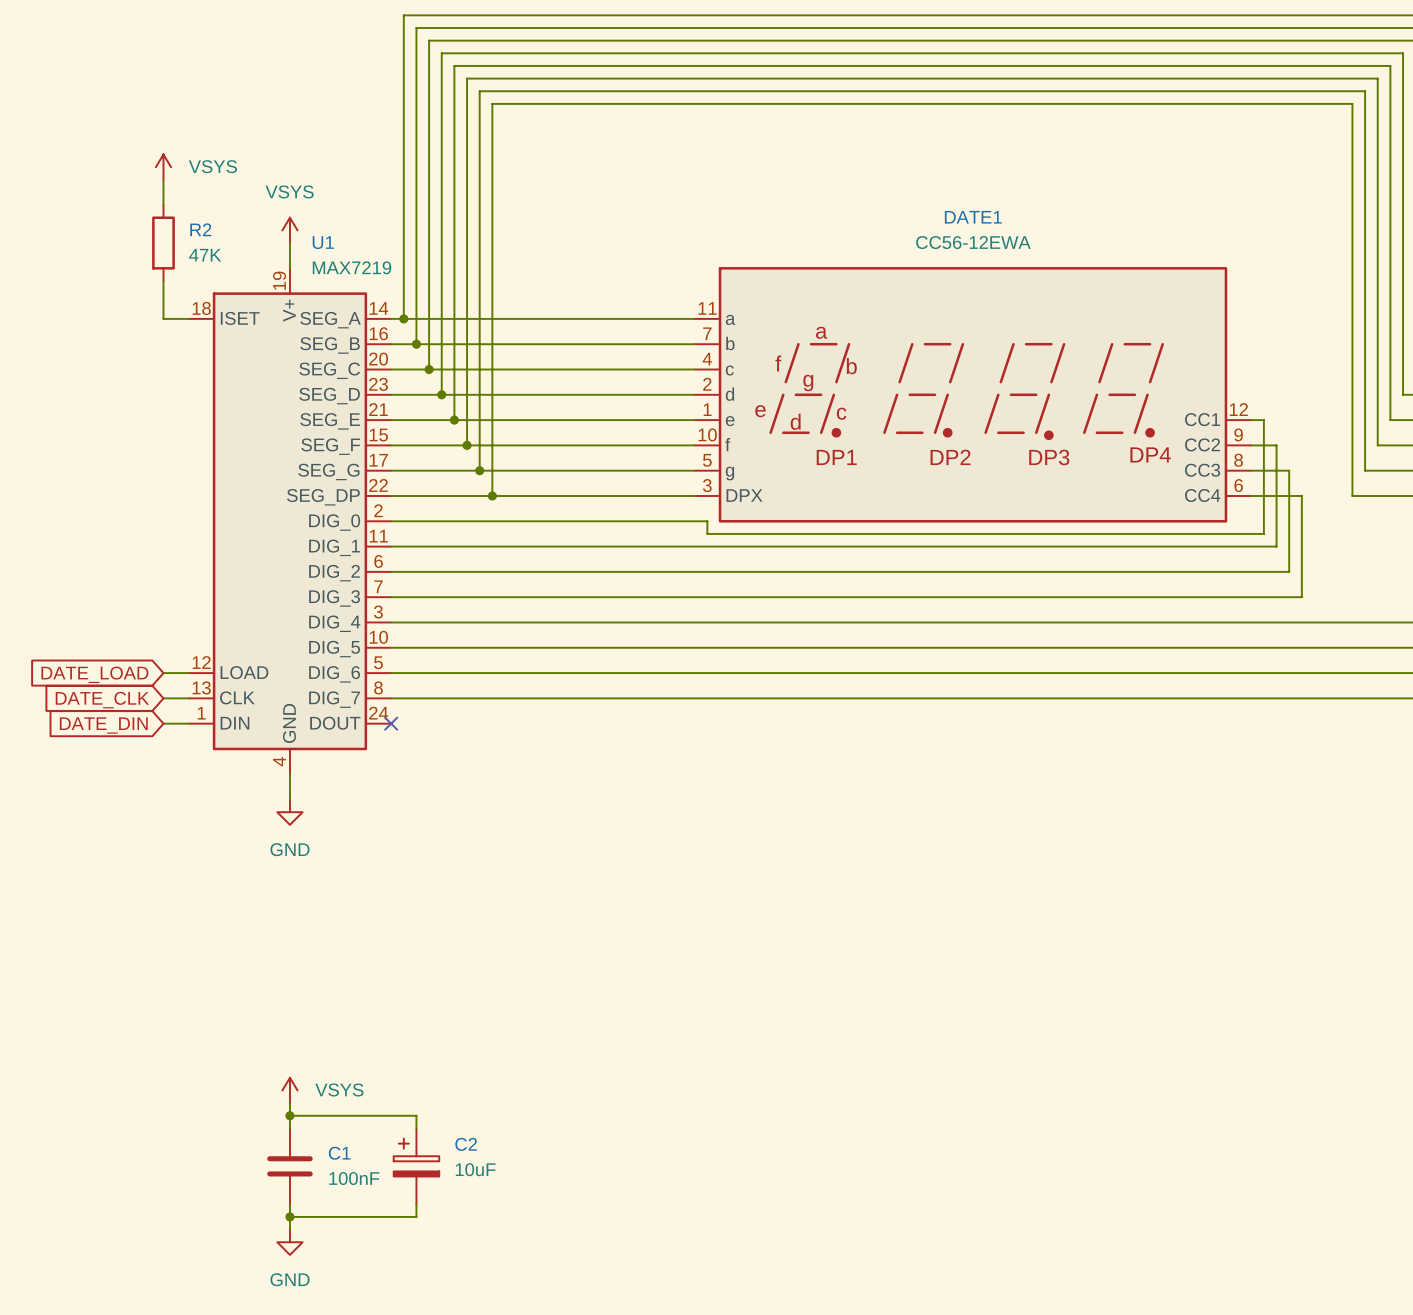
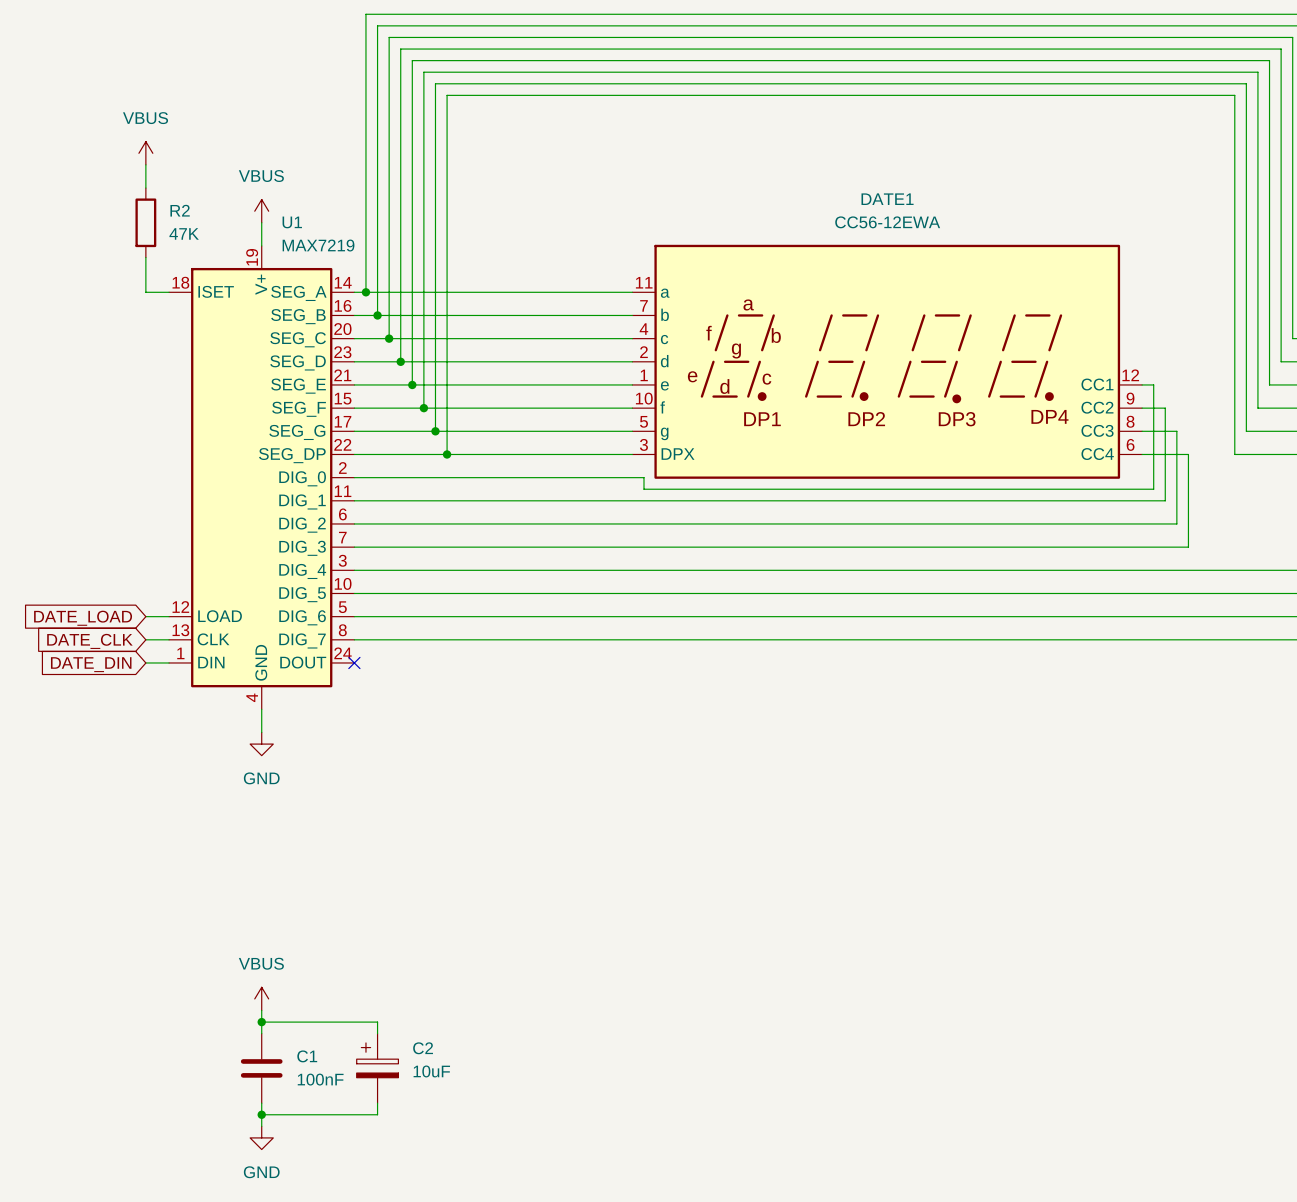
power symbol: VSYS (163, 167) -> VBUS (145, 153)
power symbol: VSYS (289, 230) -> VBUS (261, 211)
power symbol: VSYS (289, 1090) -> VBUS (261, 998)

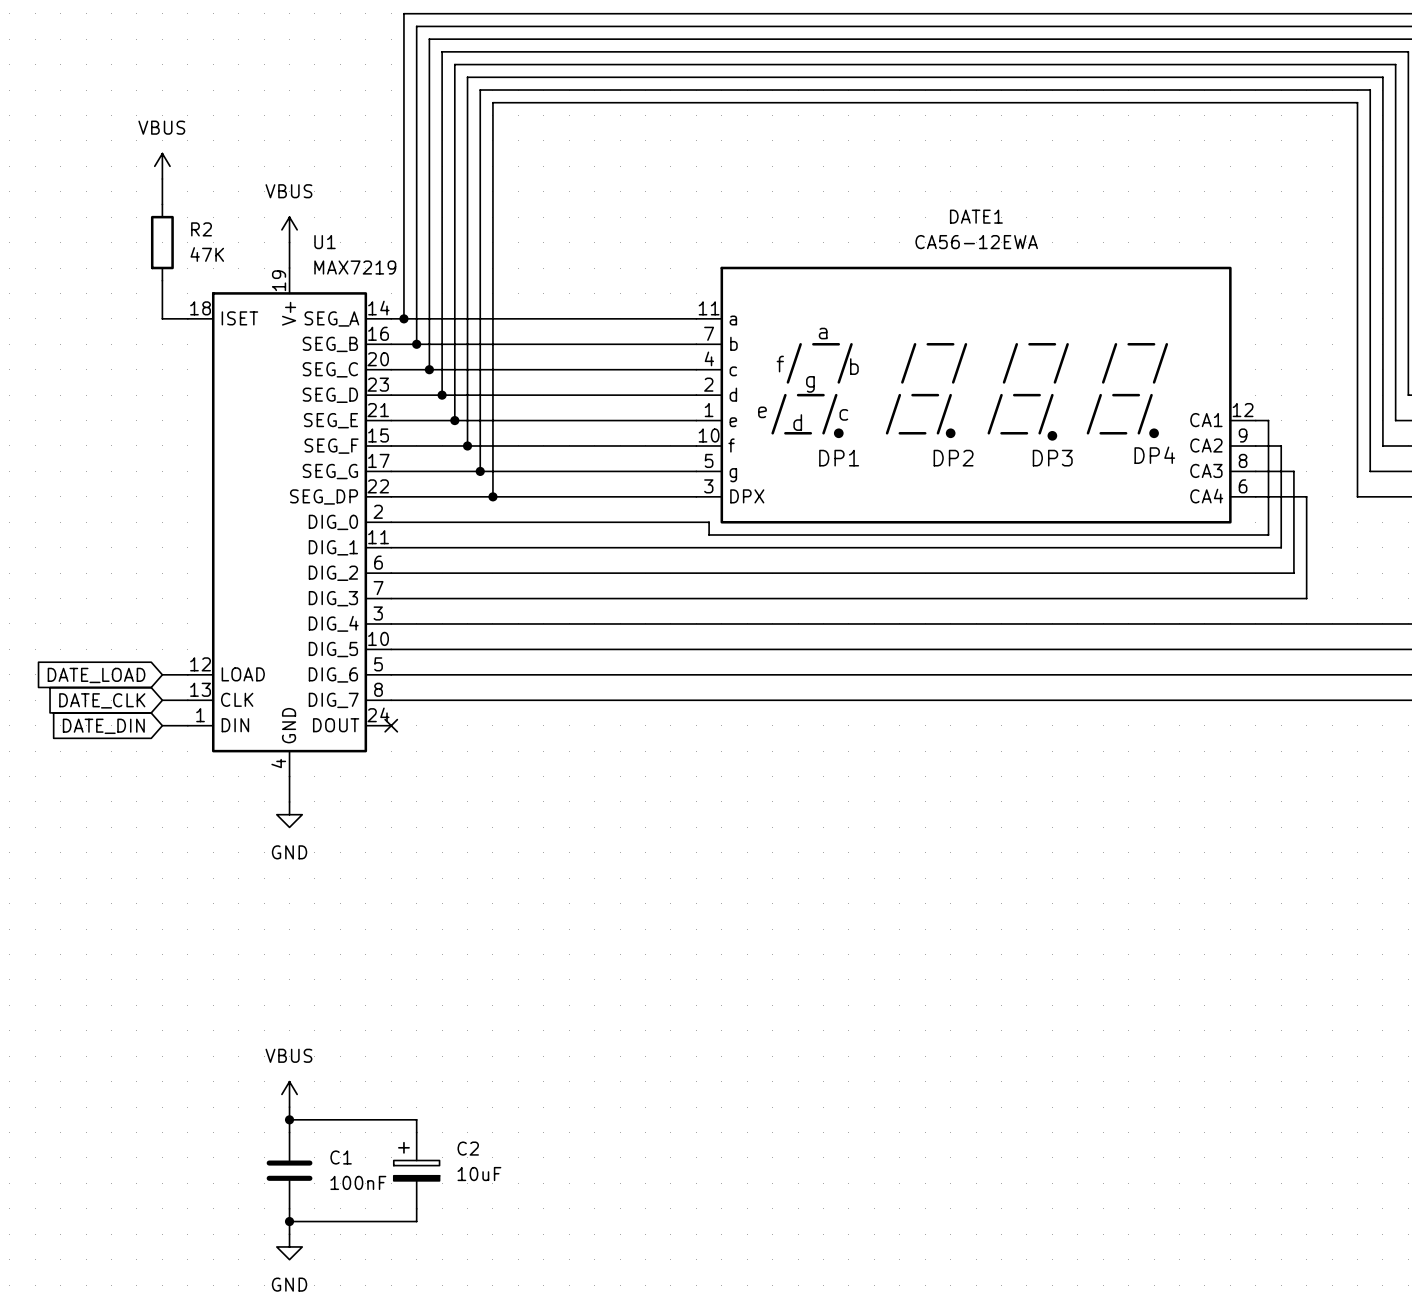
DATE1 value: CC56-12EWA (887, 222) -> CA56-12EWA (976, 242)
DATE1 pin name: CC1 (1097, 384) -> CA1 (1206, 420)
DATE1 pin name: CC2 (1097, 407) -> CA2 (1206, 445)
DATE1 pin name: CC3 (1097, 430) -> CA3 (1206, 470)
DATE1 pin name: CC4 (1097, 454) -> CA4 (1206, 496)

